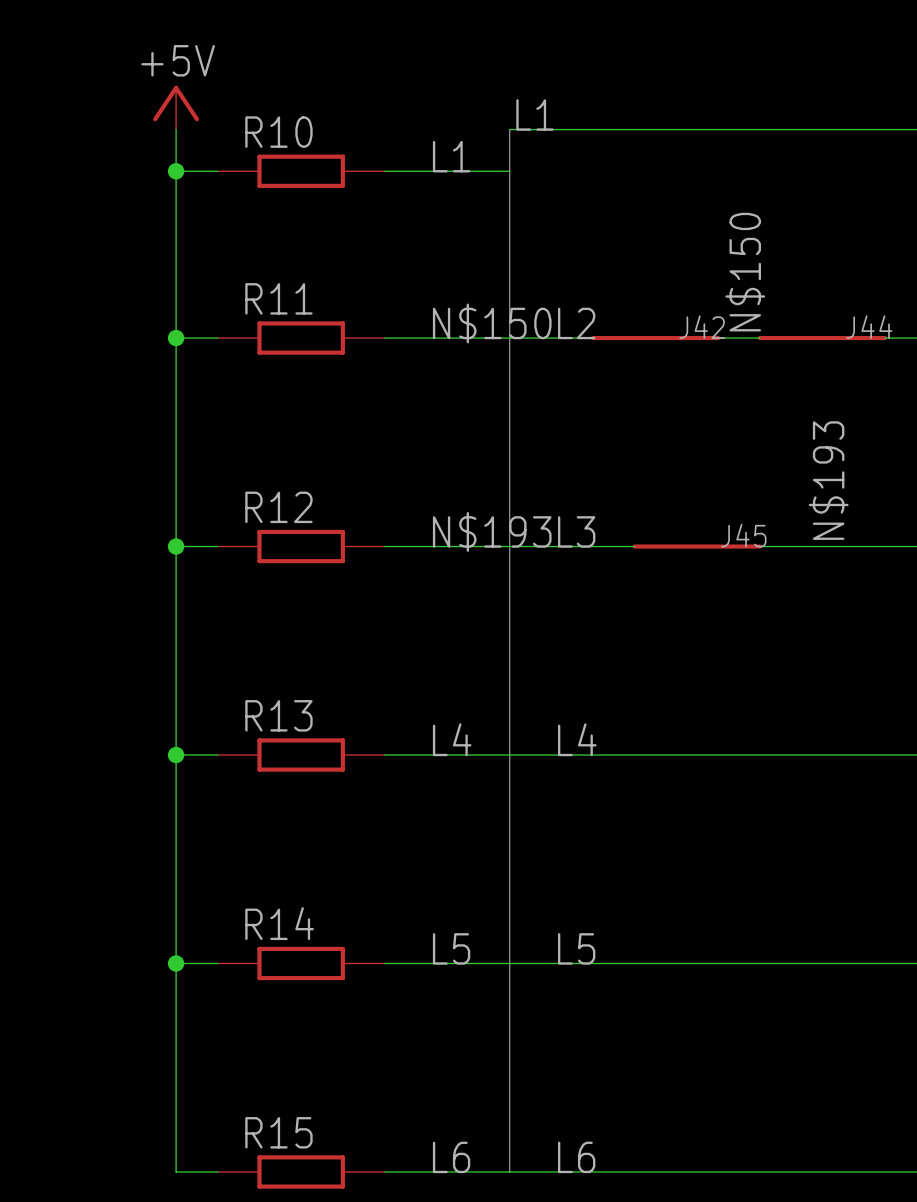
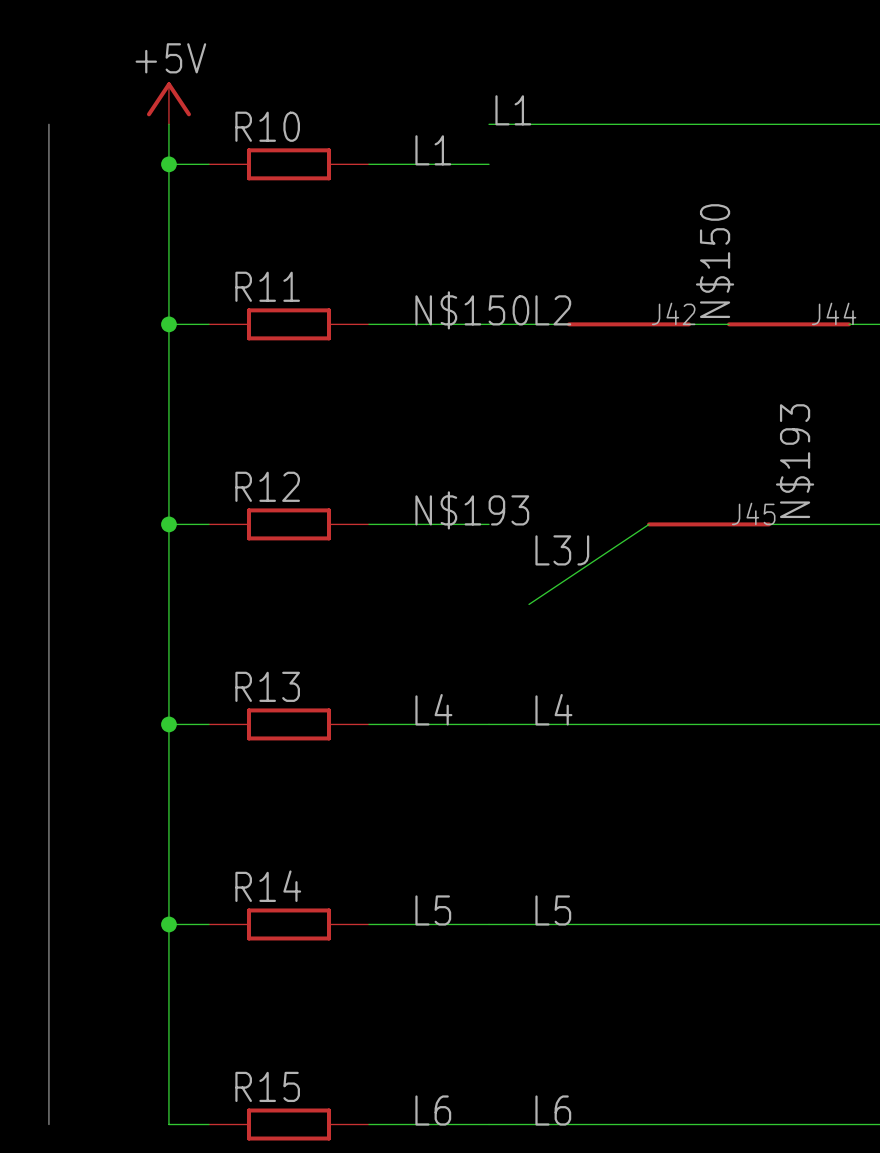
bus: none -> (48, 124) (48, 1124)
bus: (509, 129) (509, 1171) -> none
label: L3 (576, 531) -> L3J (562, 550)
wire: (509, 546) (634, 546) -> none
wire: none -> (649, 524) (529, 604)
J45 position: (697, 546) -> (709, 524)

